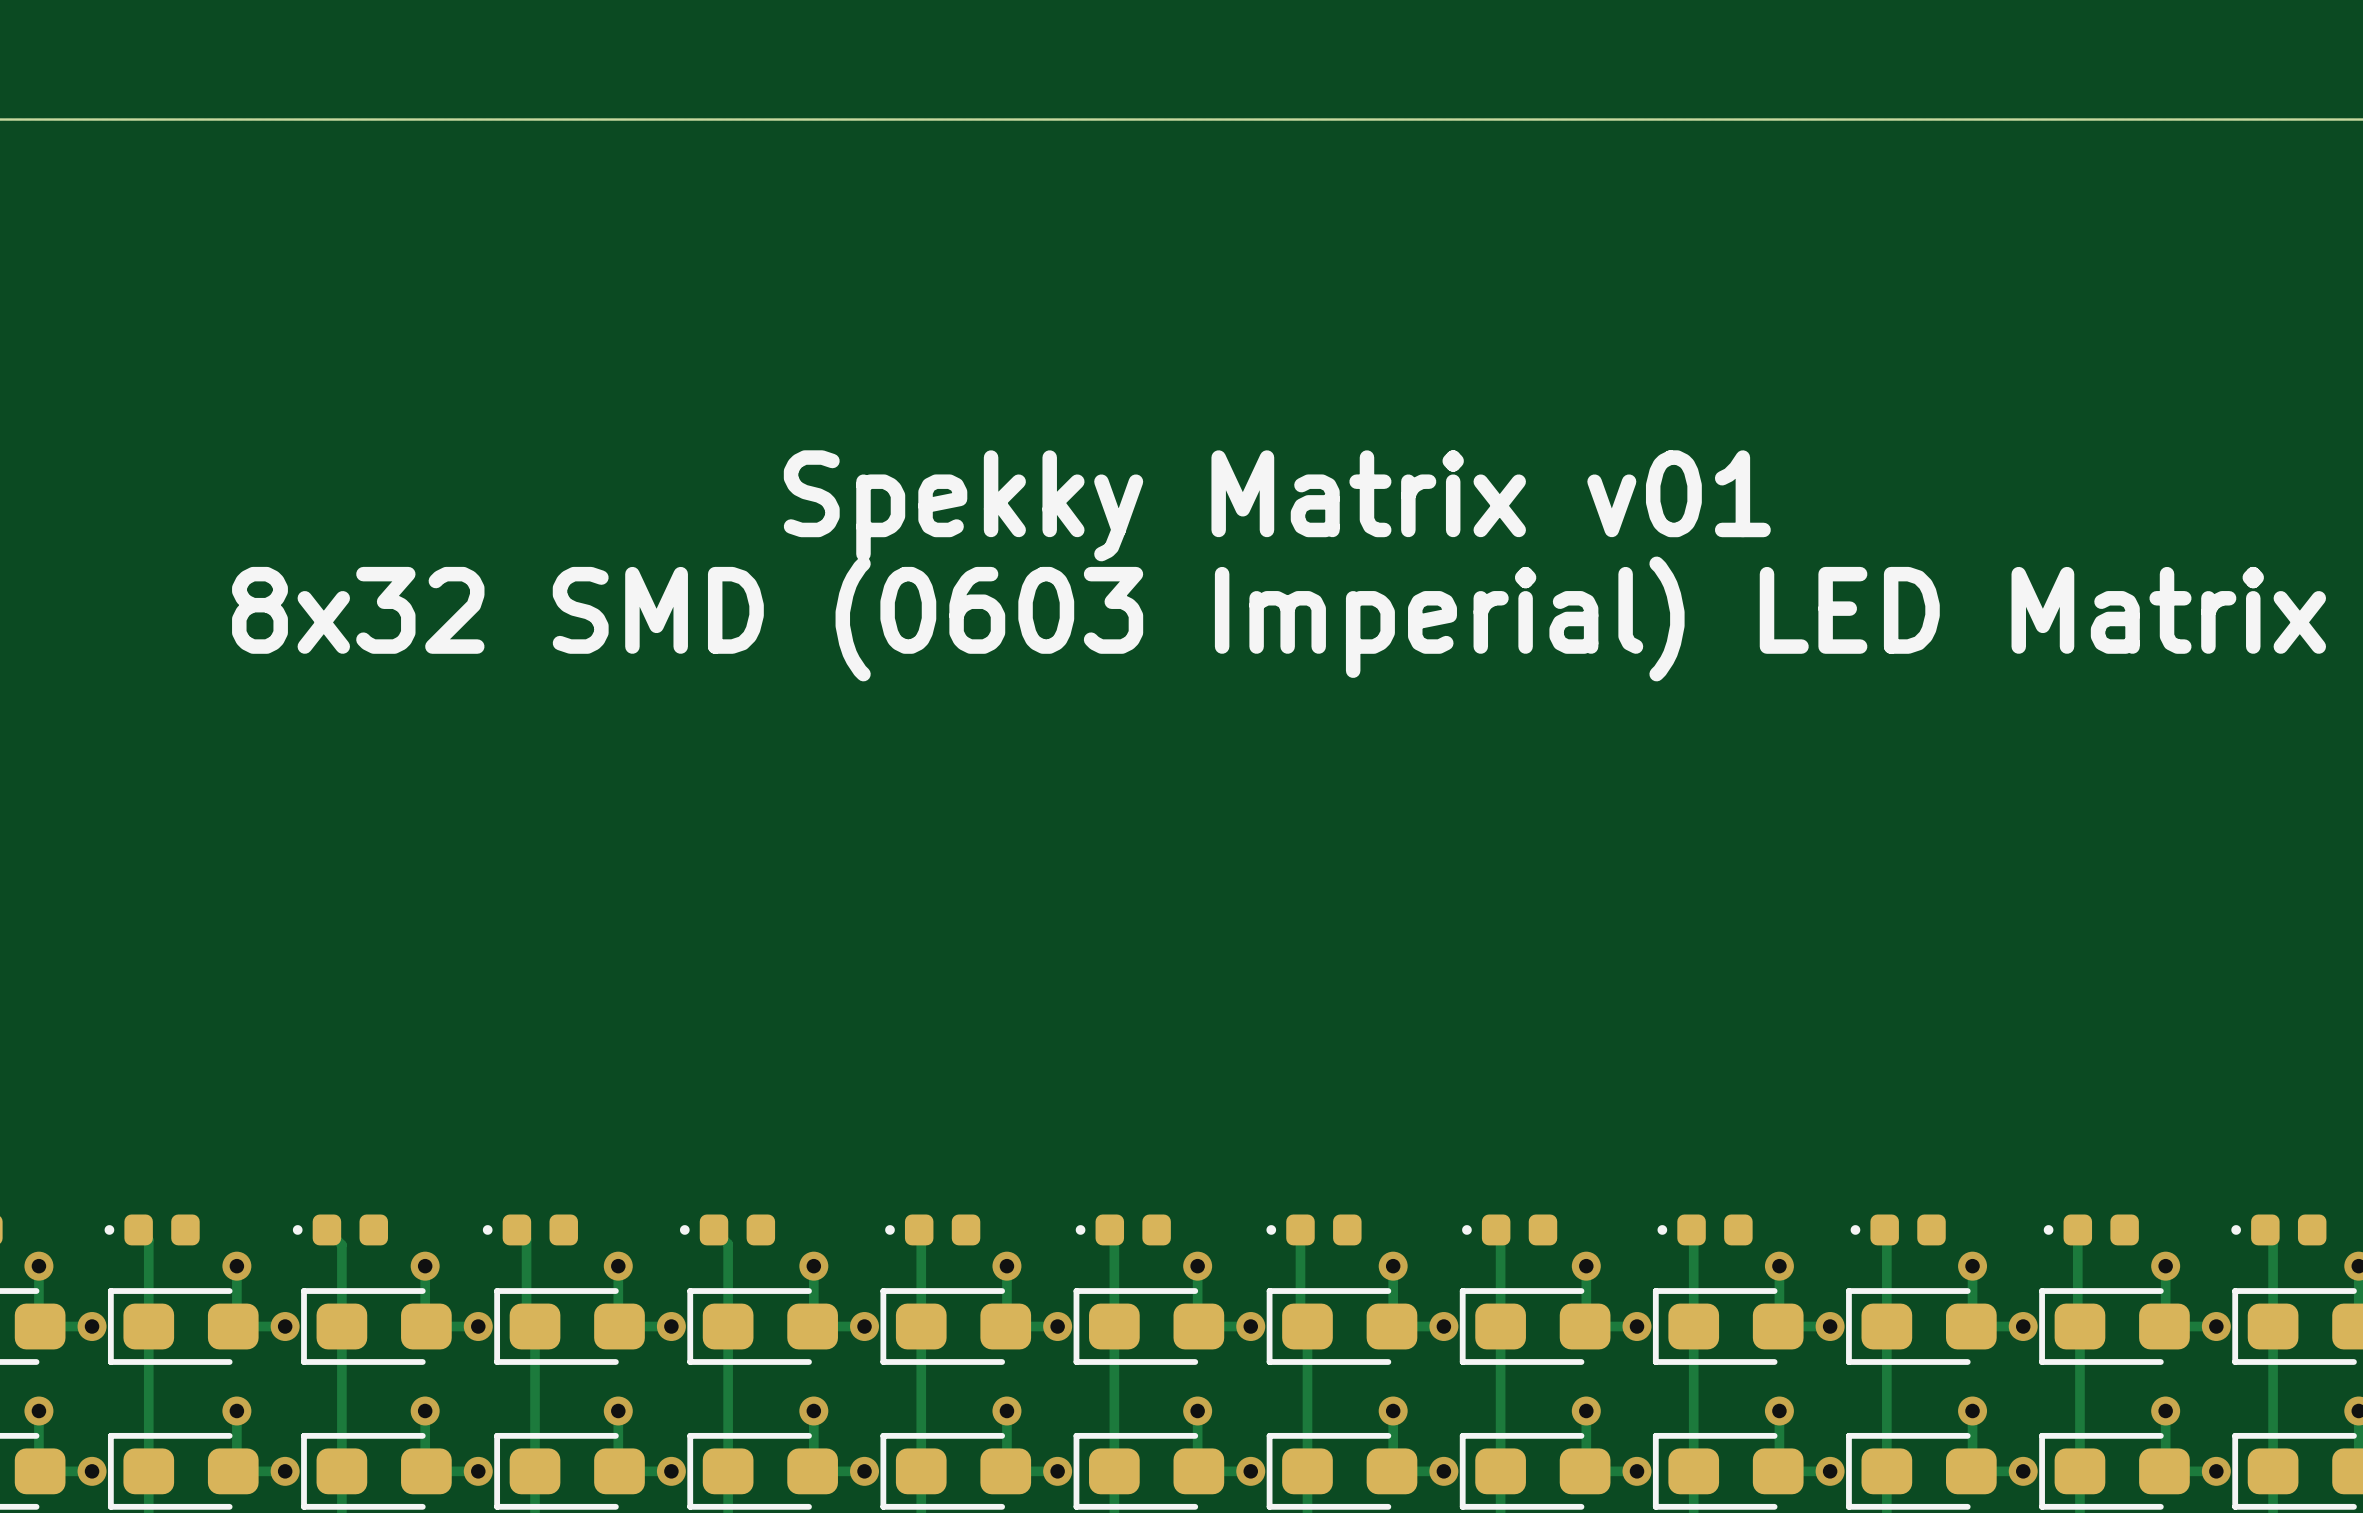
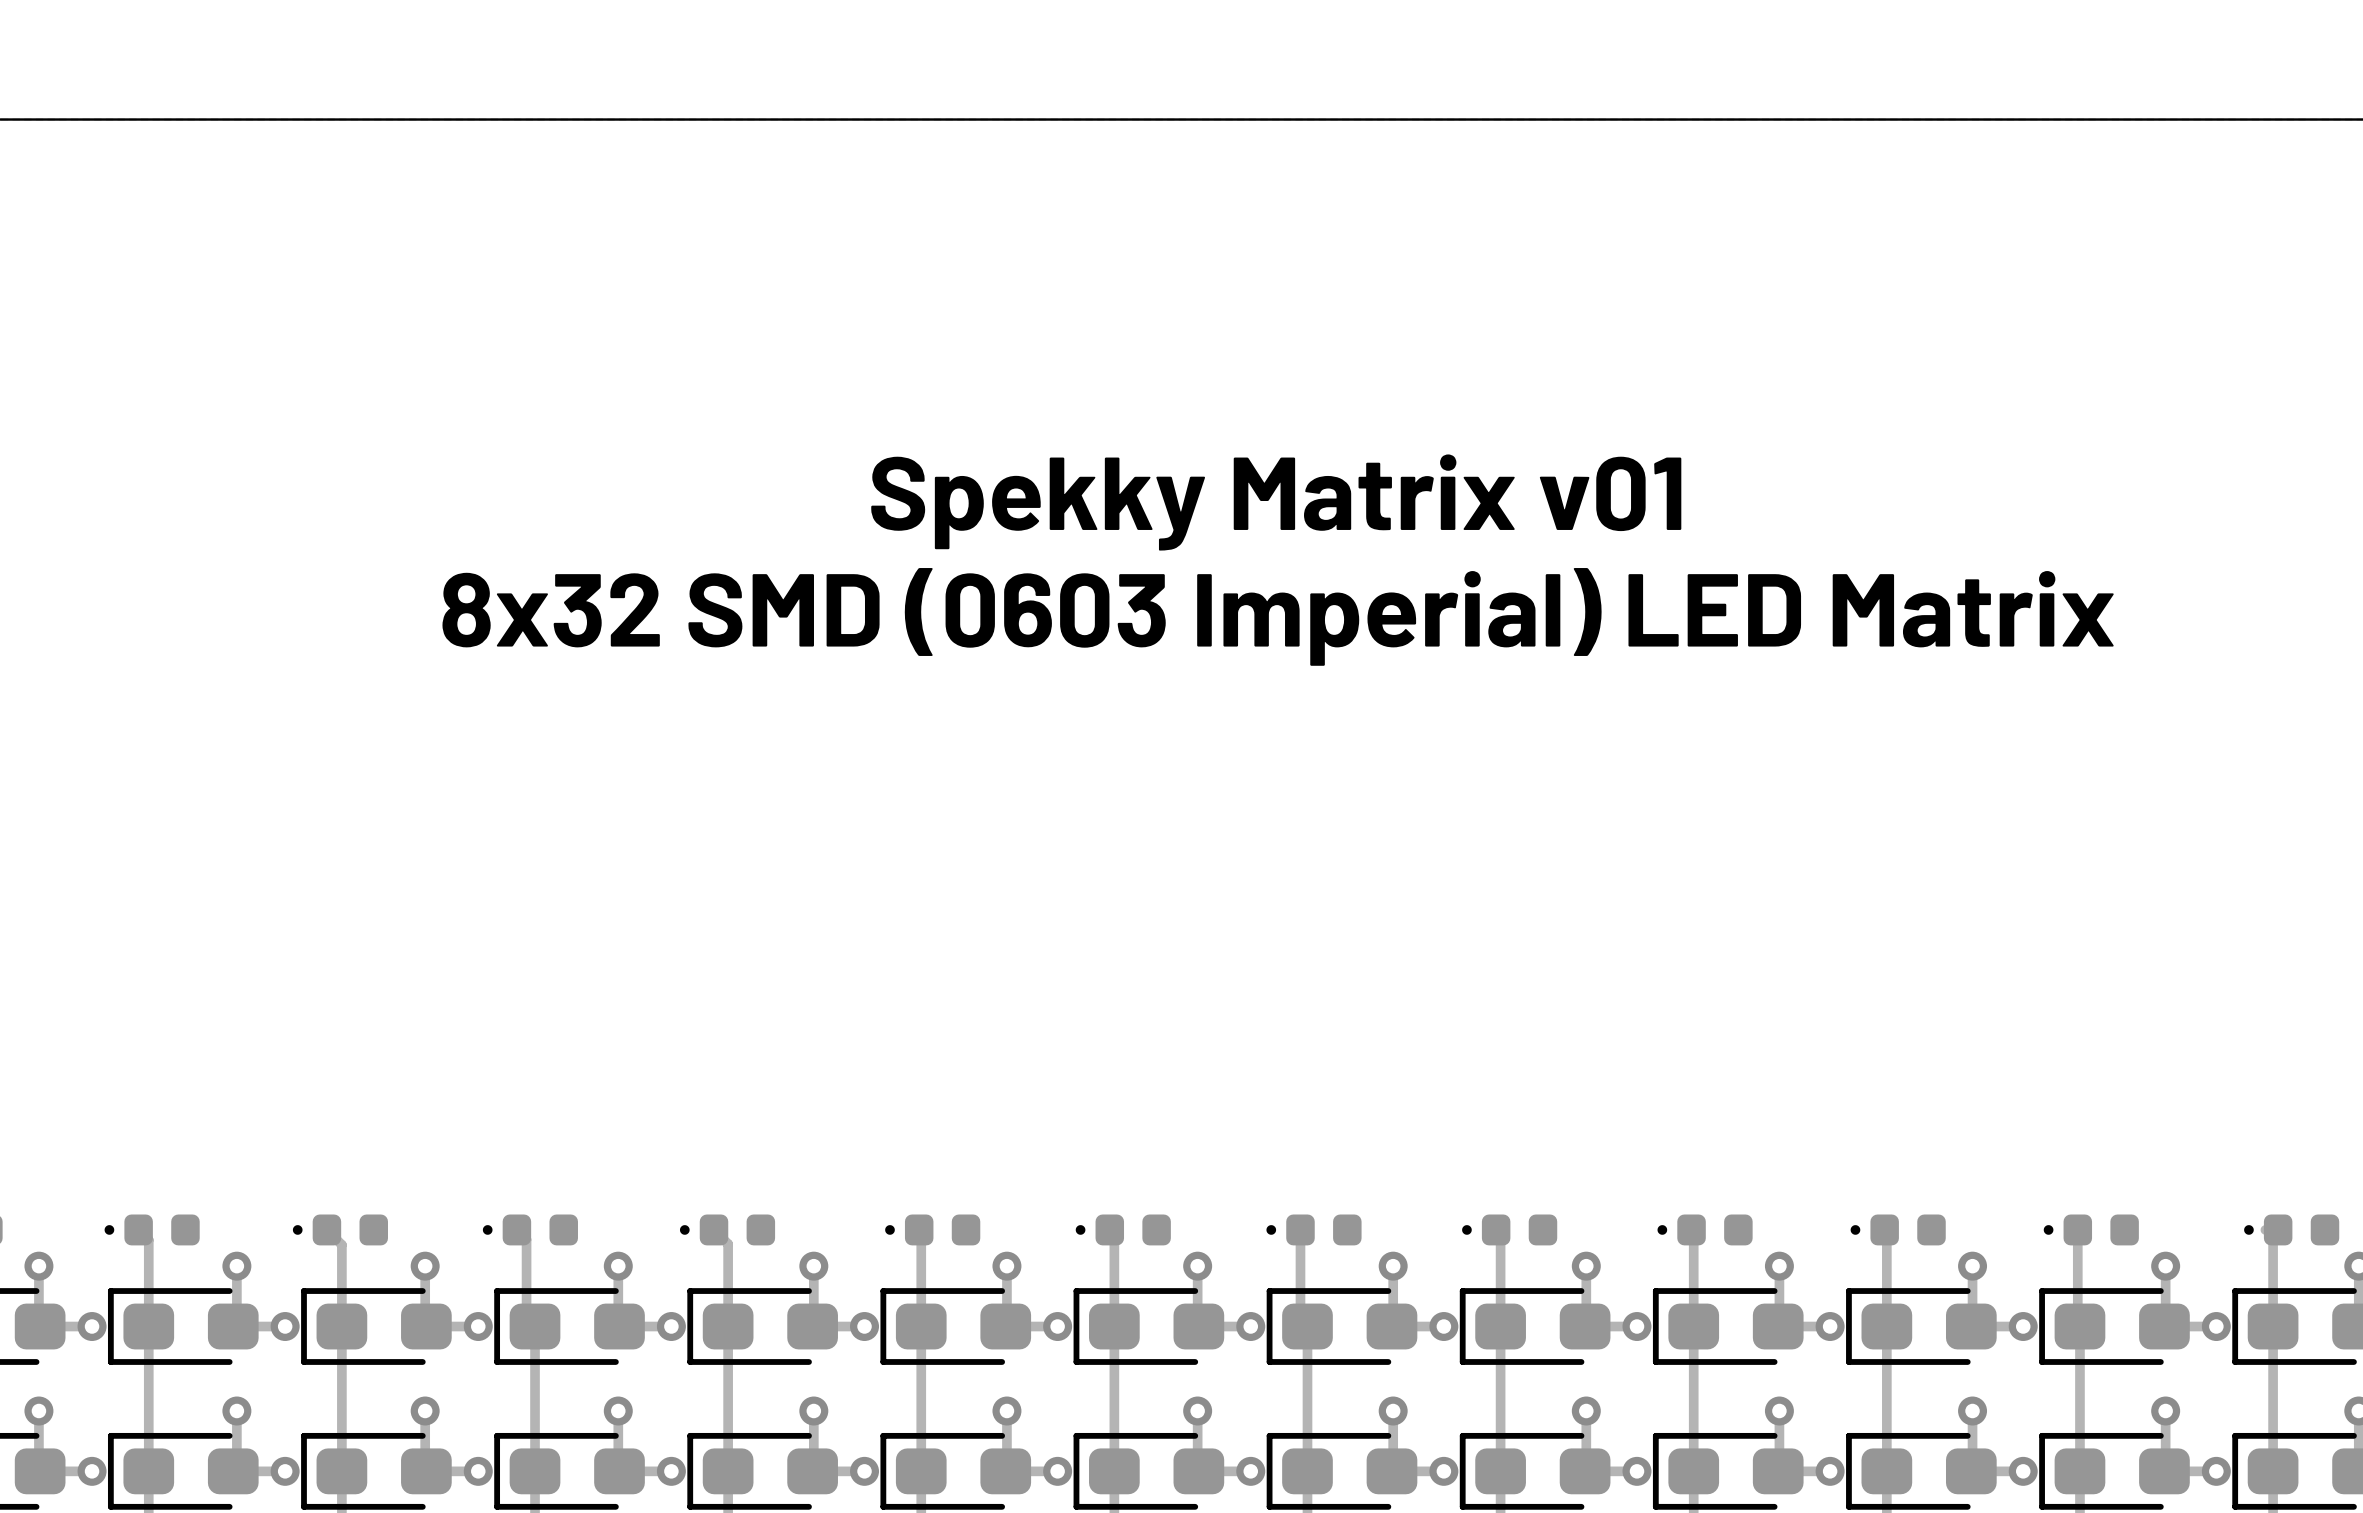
part position: (2278, 1229) -> (2291, 1229)

